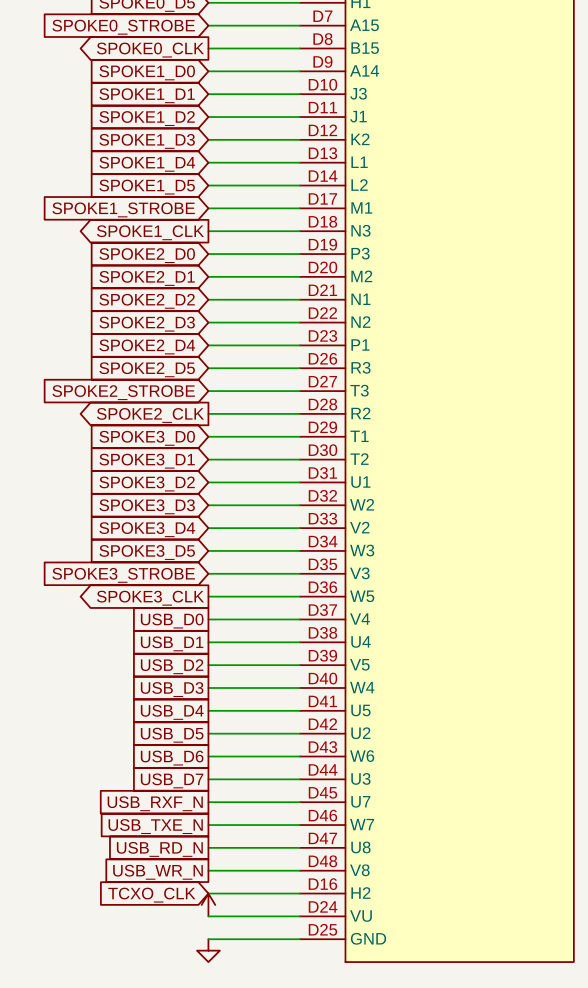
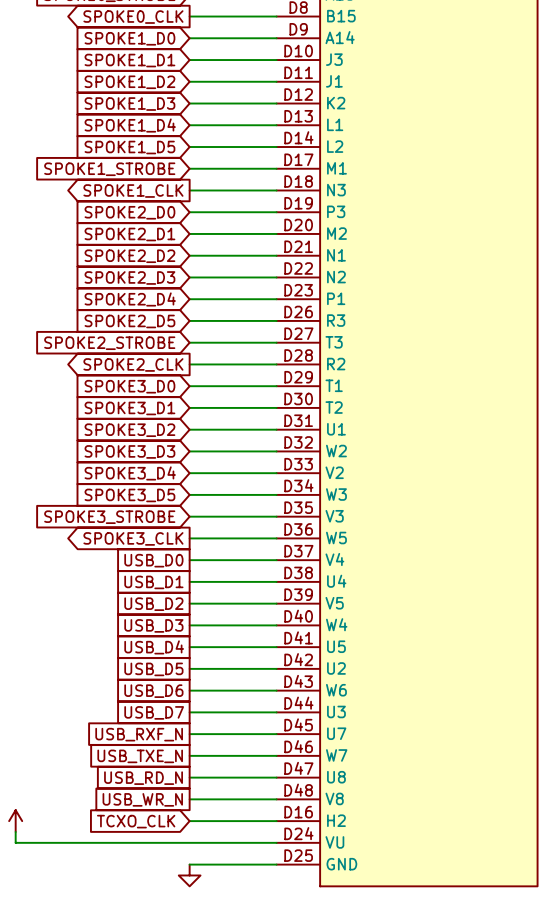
wire: none -> (15, 831) (15, 842) (189, 842)
power symbol position: (208, 904) -> (15, 821)

